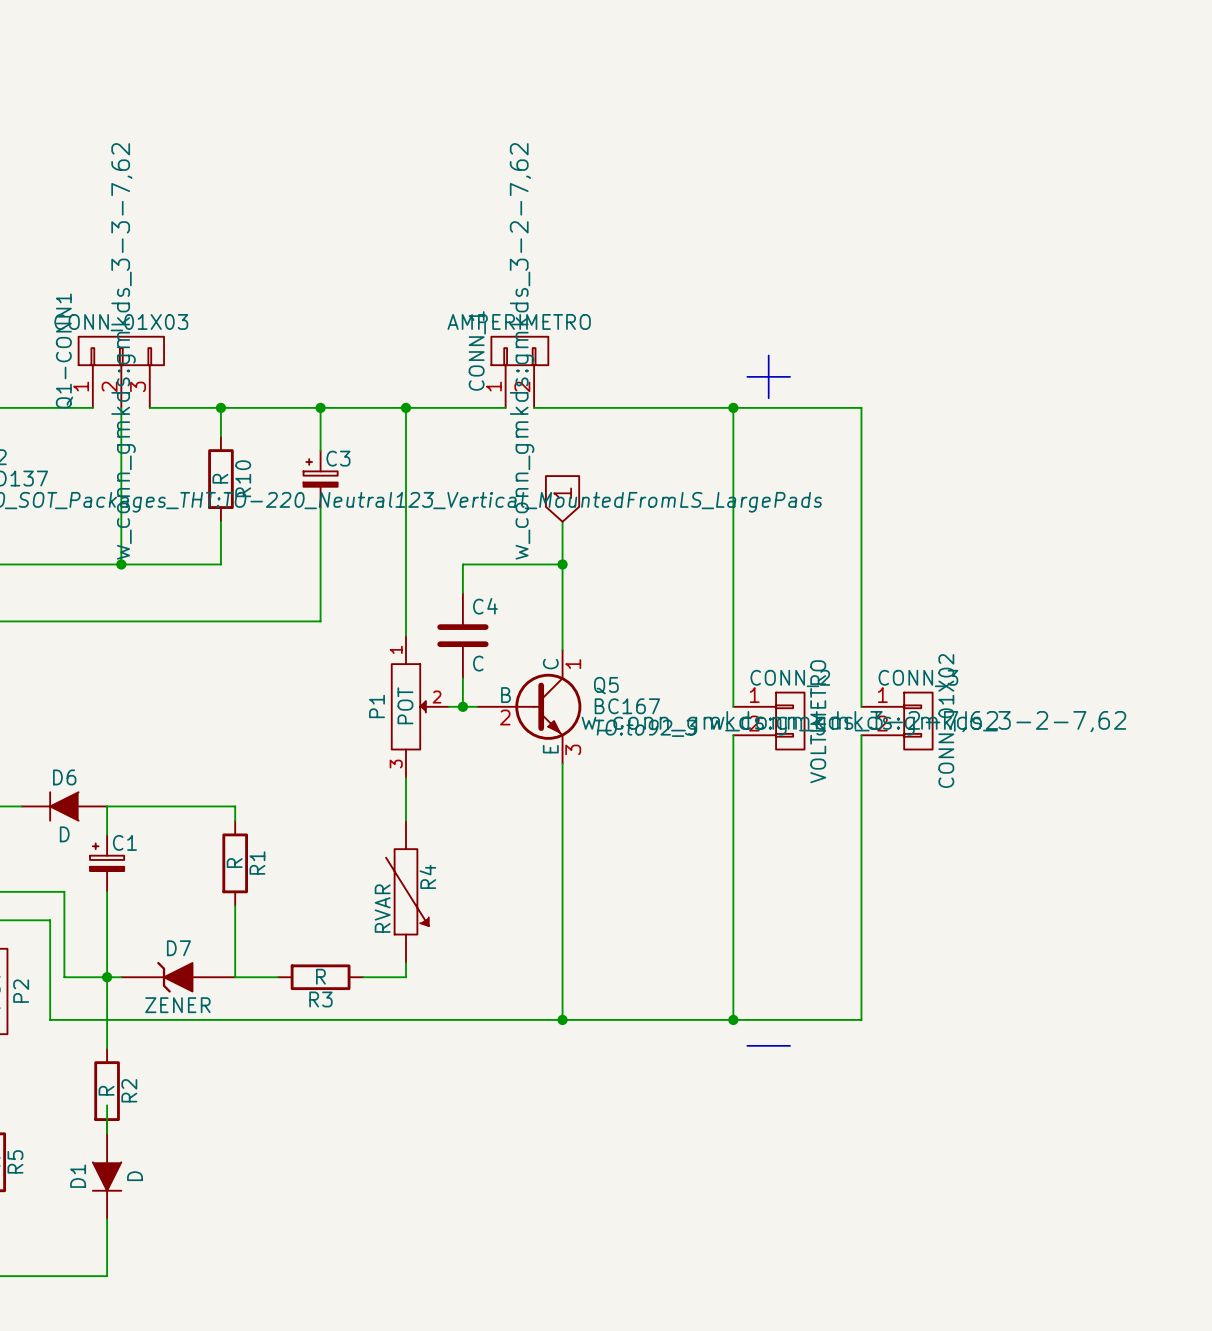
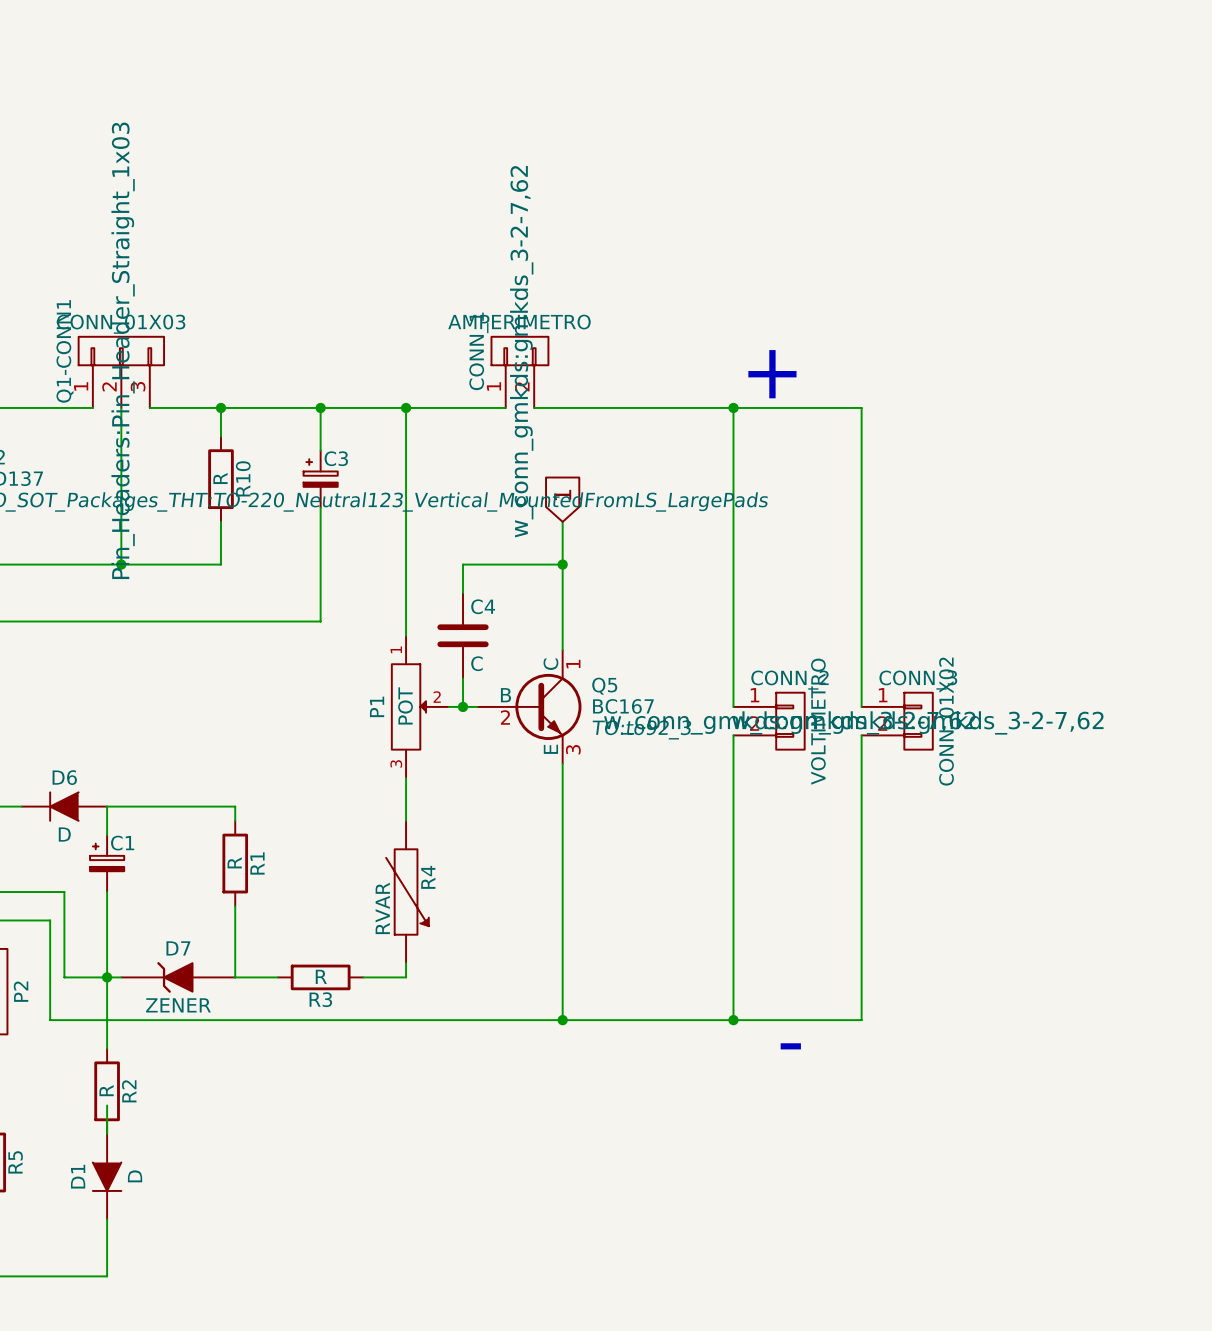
Q1-CONN1 text: w_conn_gmkds:gmkds_3-3-7,62 (123, 351) -> Pin_Headers:Pin_Header_Straight_1x03 (123, 350)

